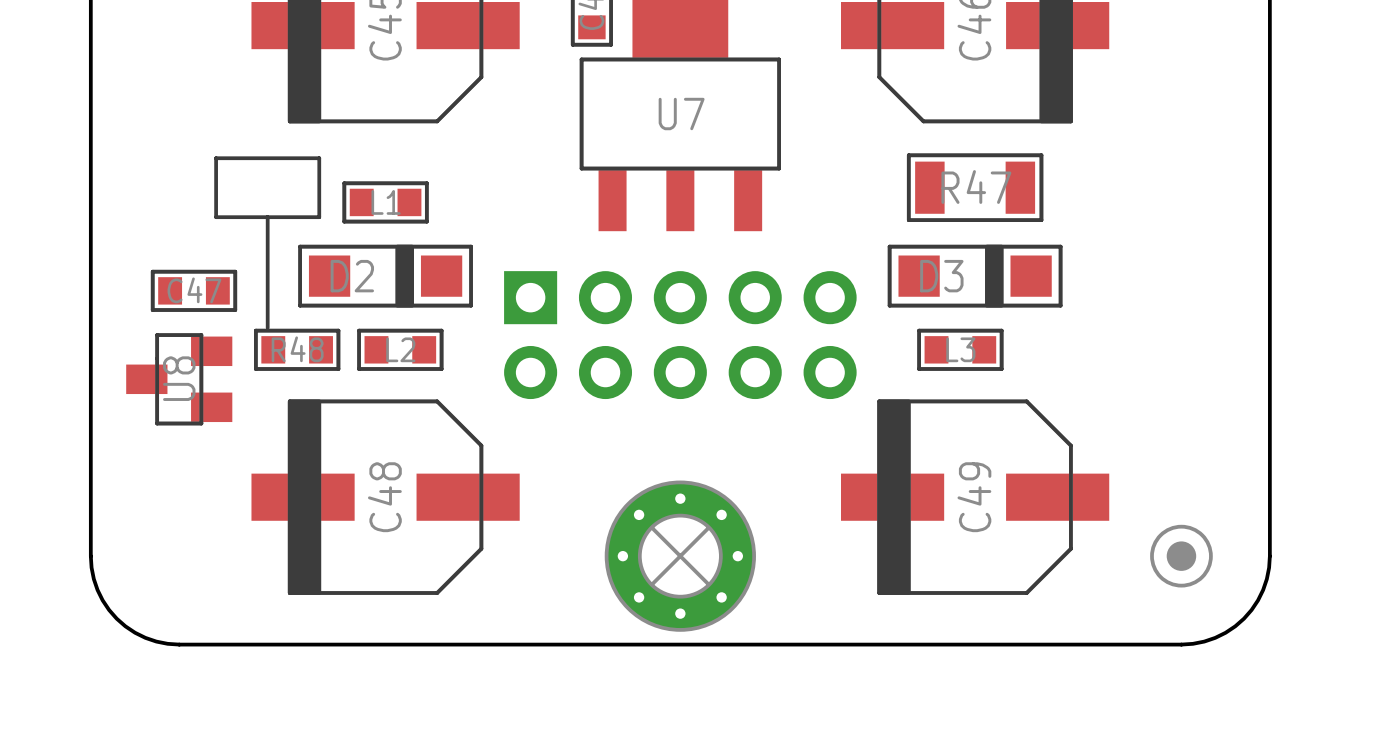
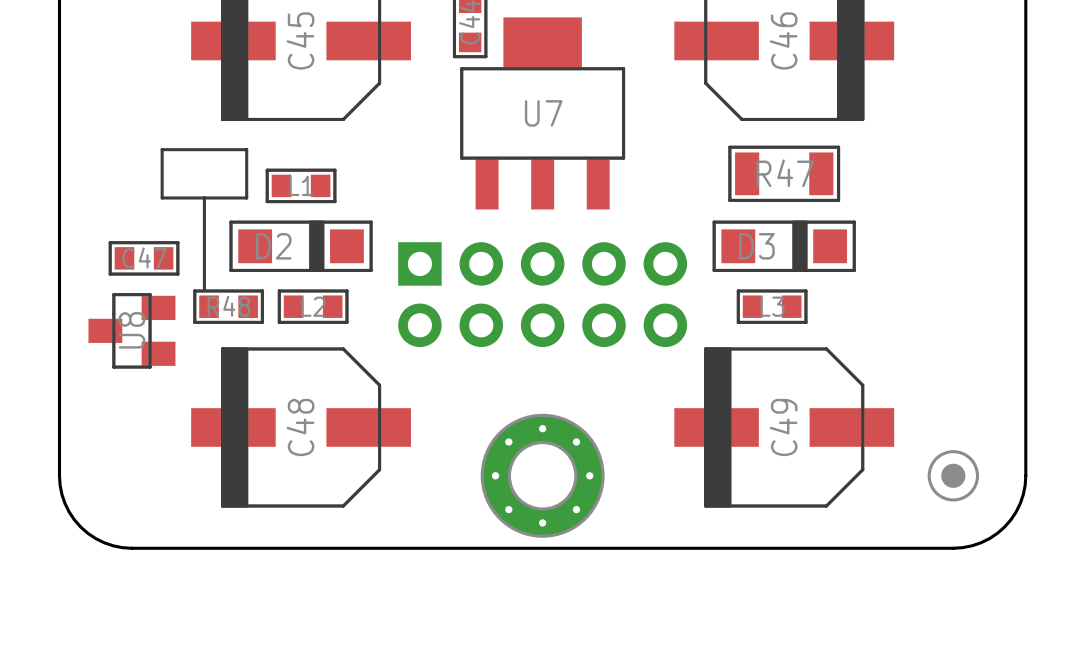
part footprint: [604, 480, 756, 632] -> [480, 413, 605, 538]

